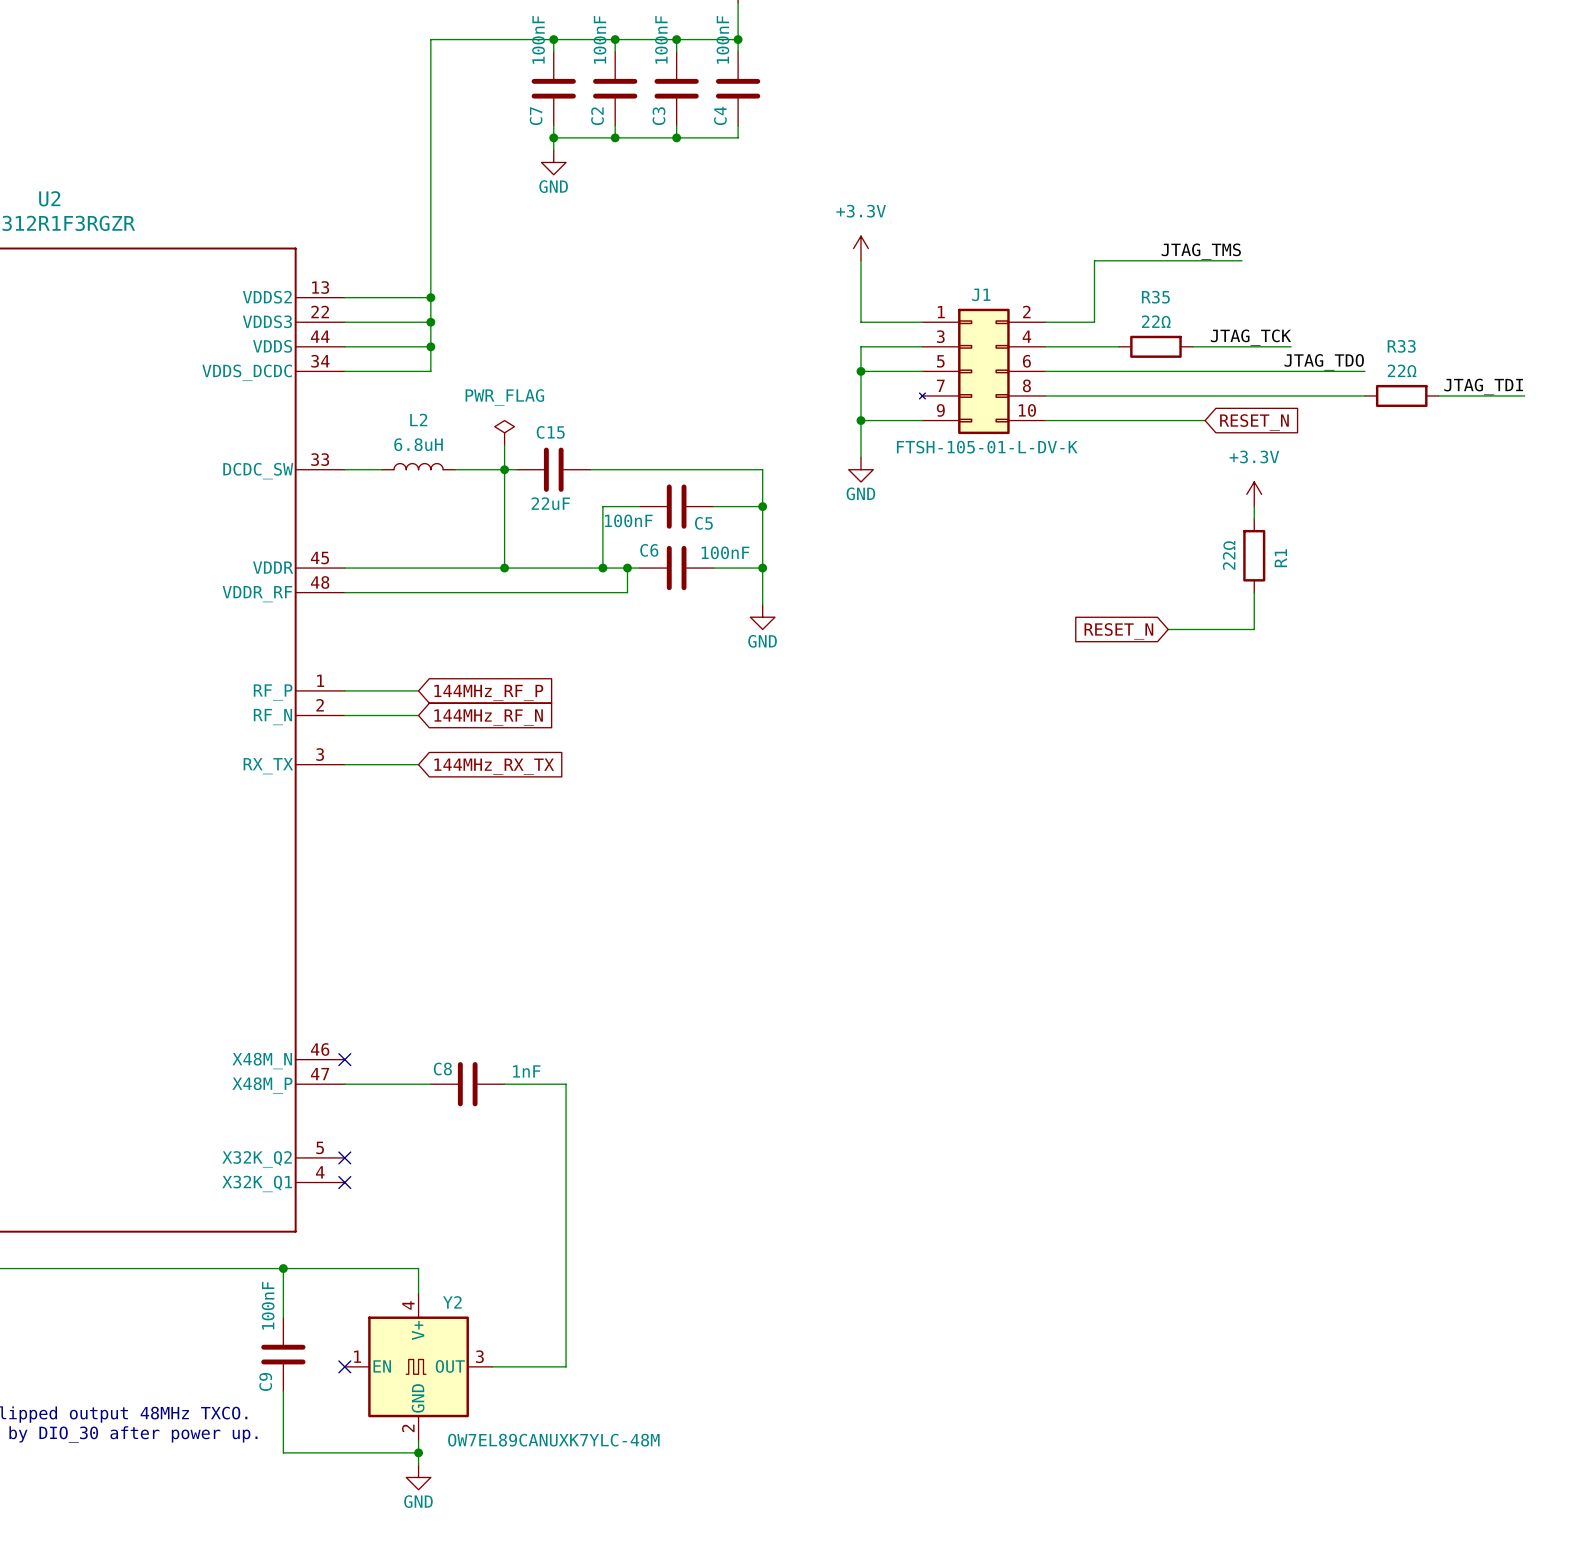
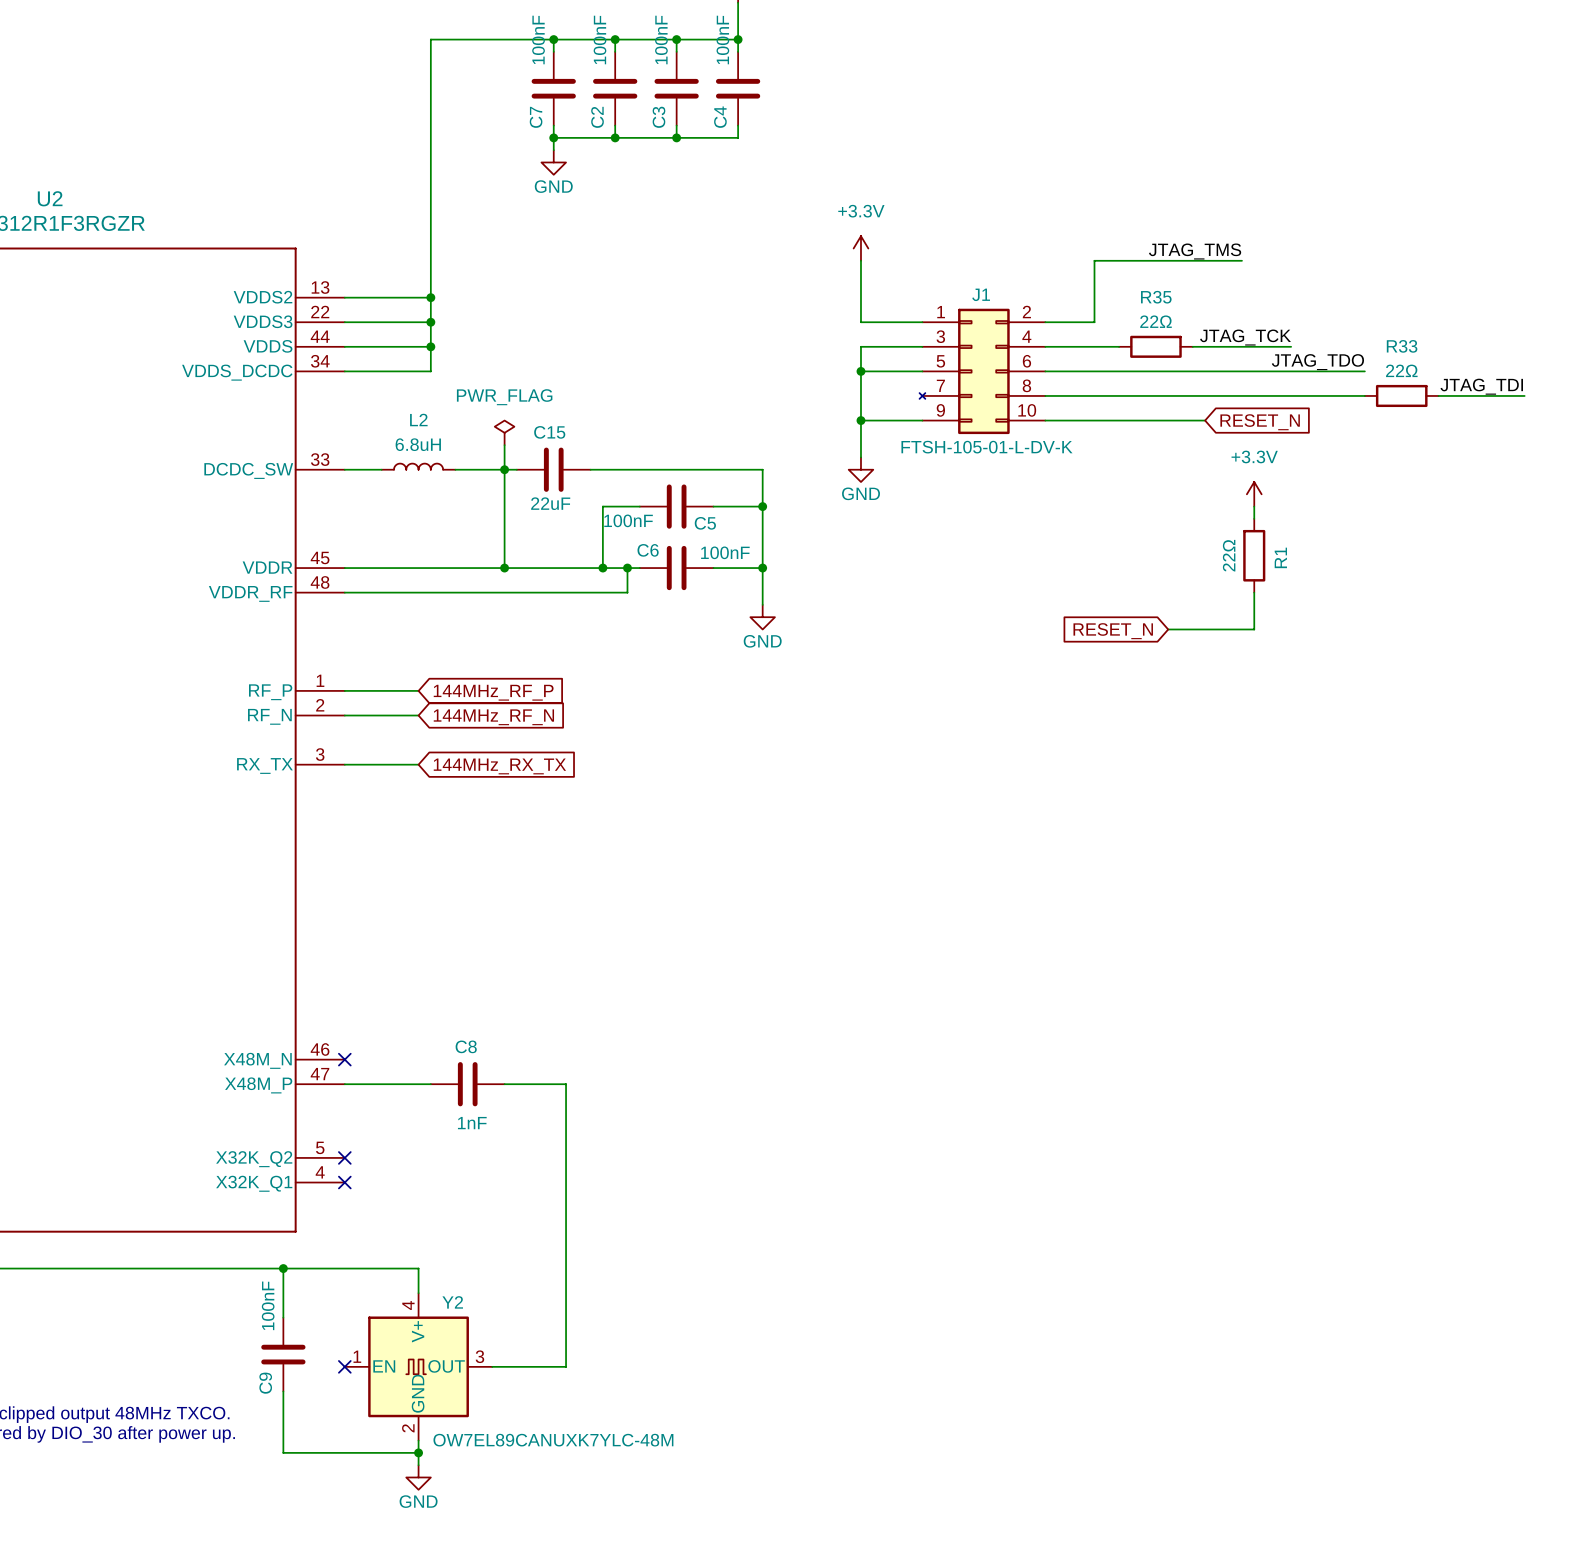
C8 name position: C8 (442, 1069) -> C8 (466, 1046)
C8 value position: 1nF (526, 1071) -> 1nF (472, 1123)

